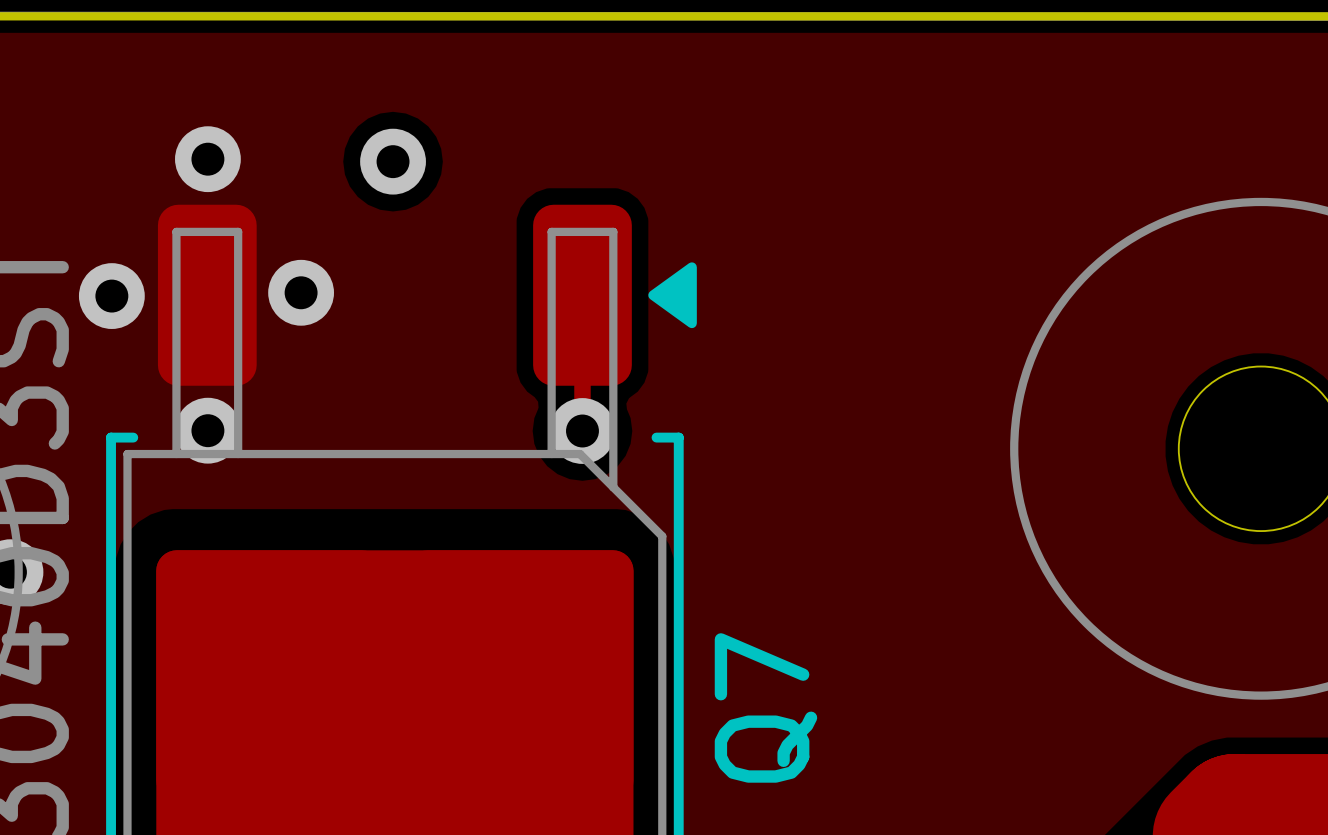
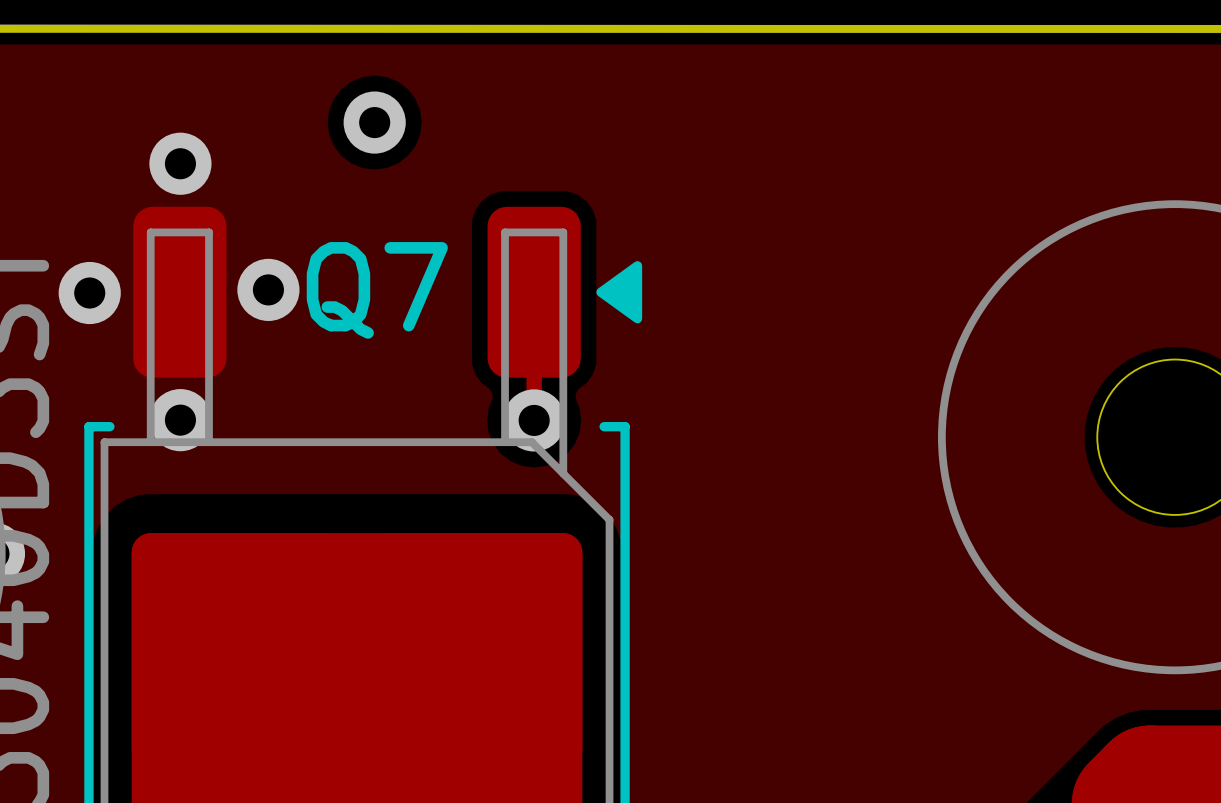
via position: (393, 161) -> (374, 122)
Q7 name rotation: 0° (765, 707) -> 90° clockwise (377, 290)
Q7 name position: Q7 (765, 707) -> Q7 (377, 290)

